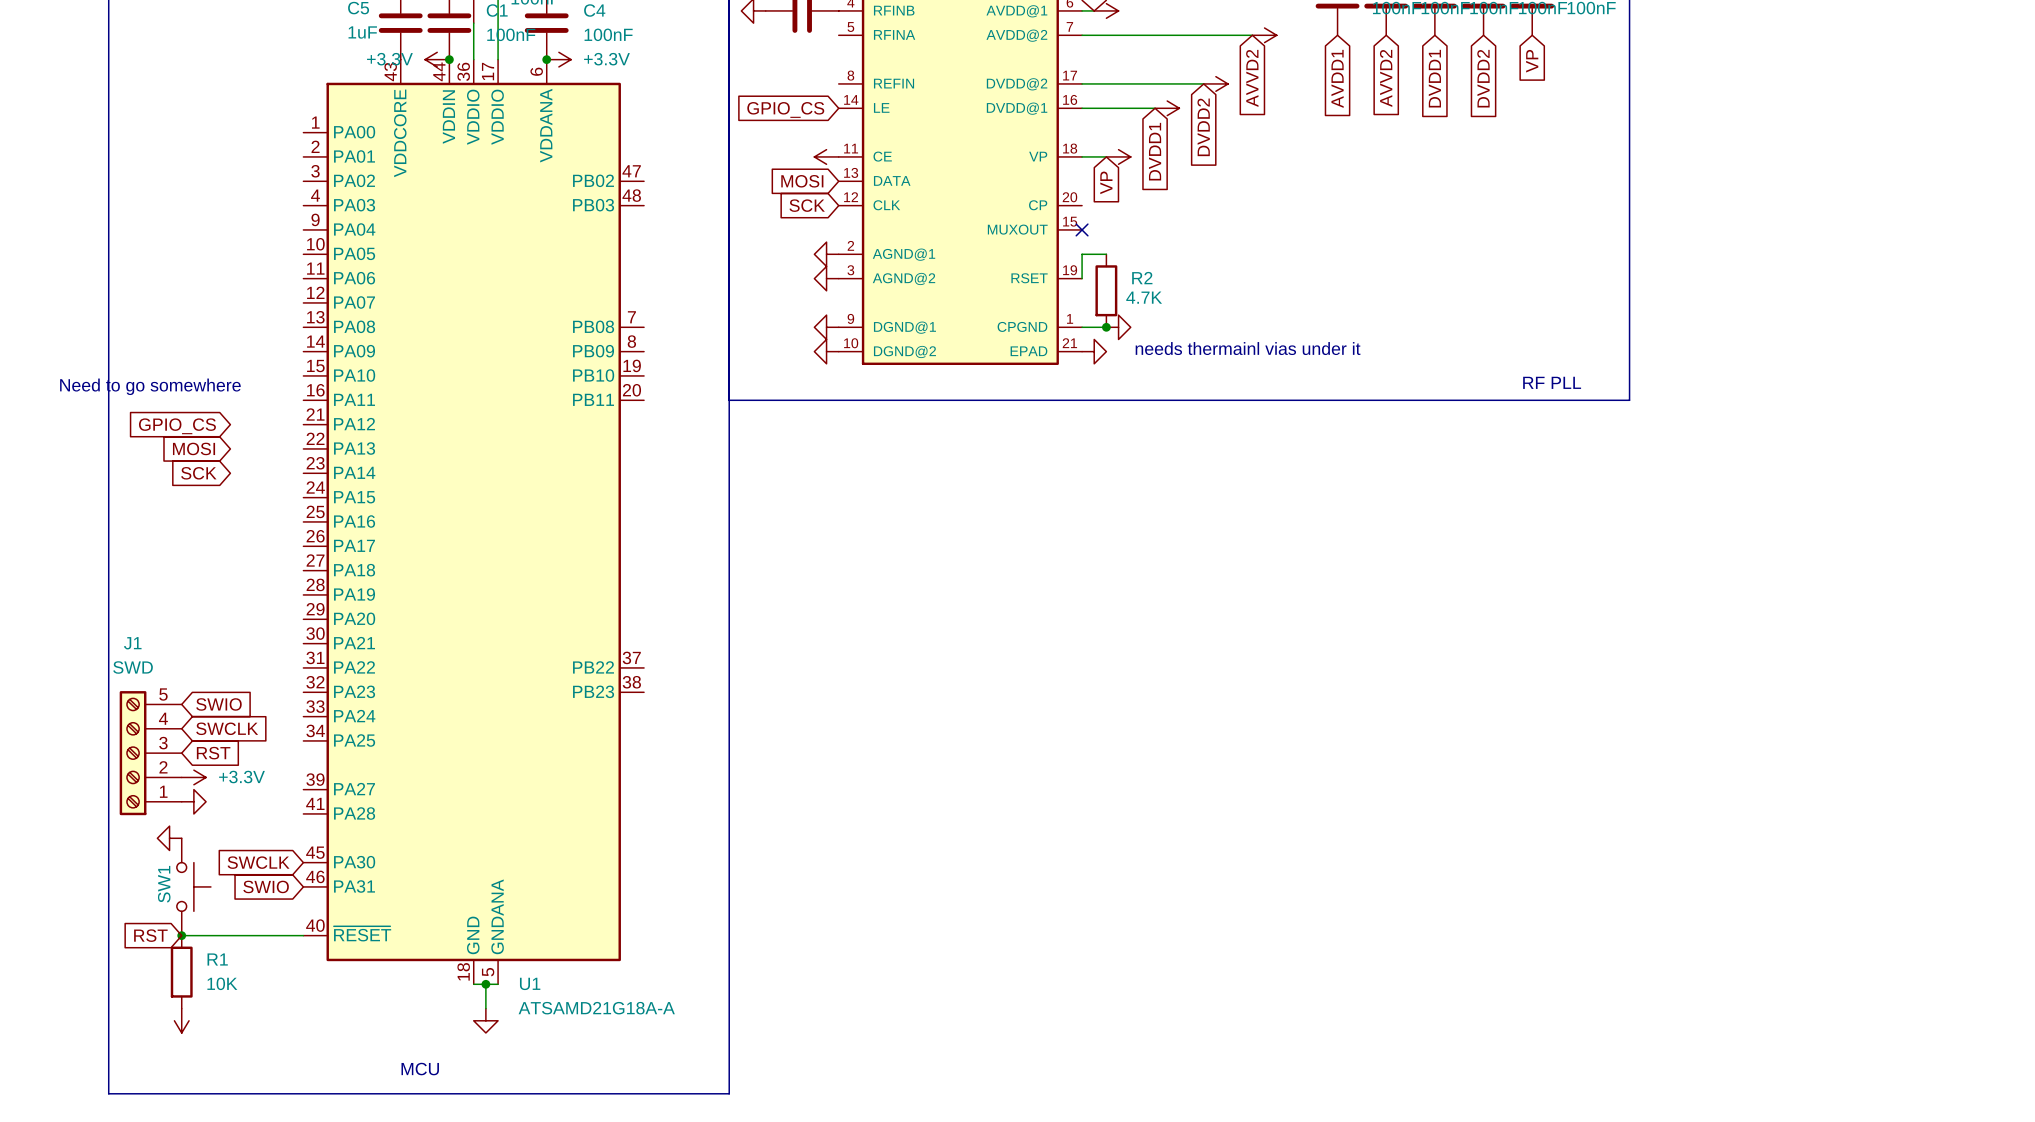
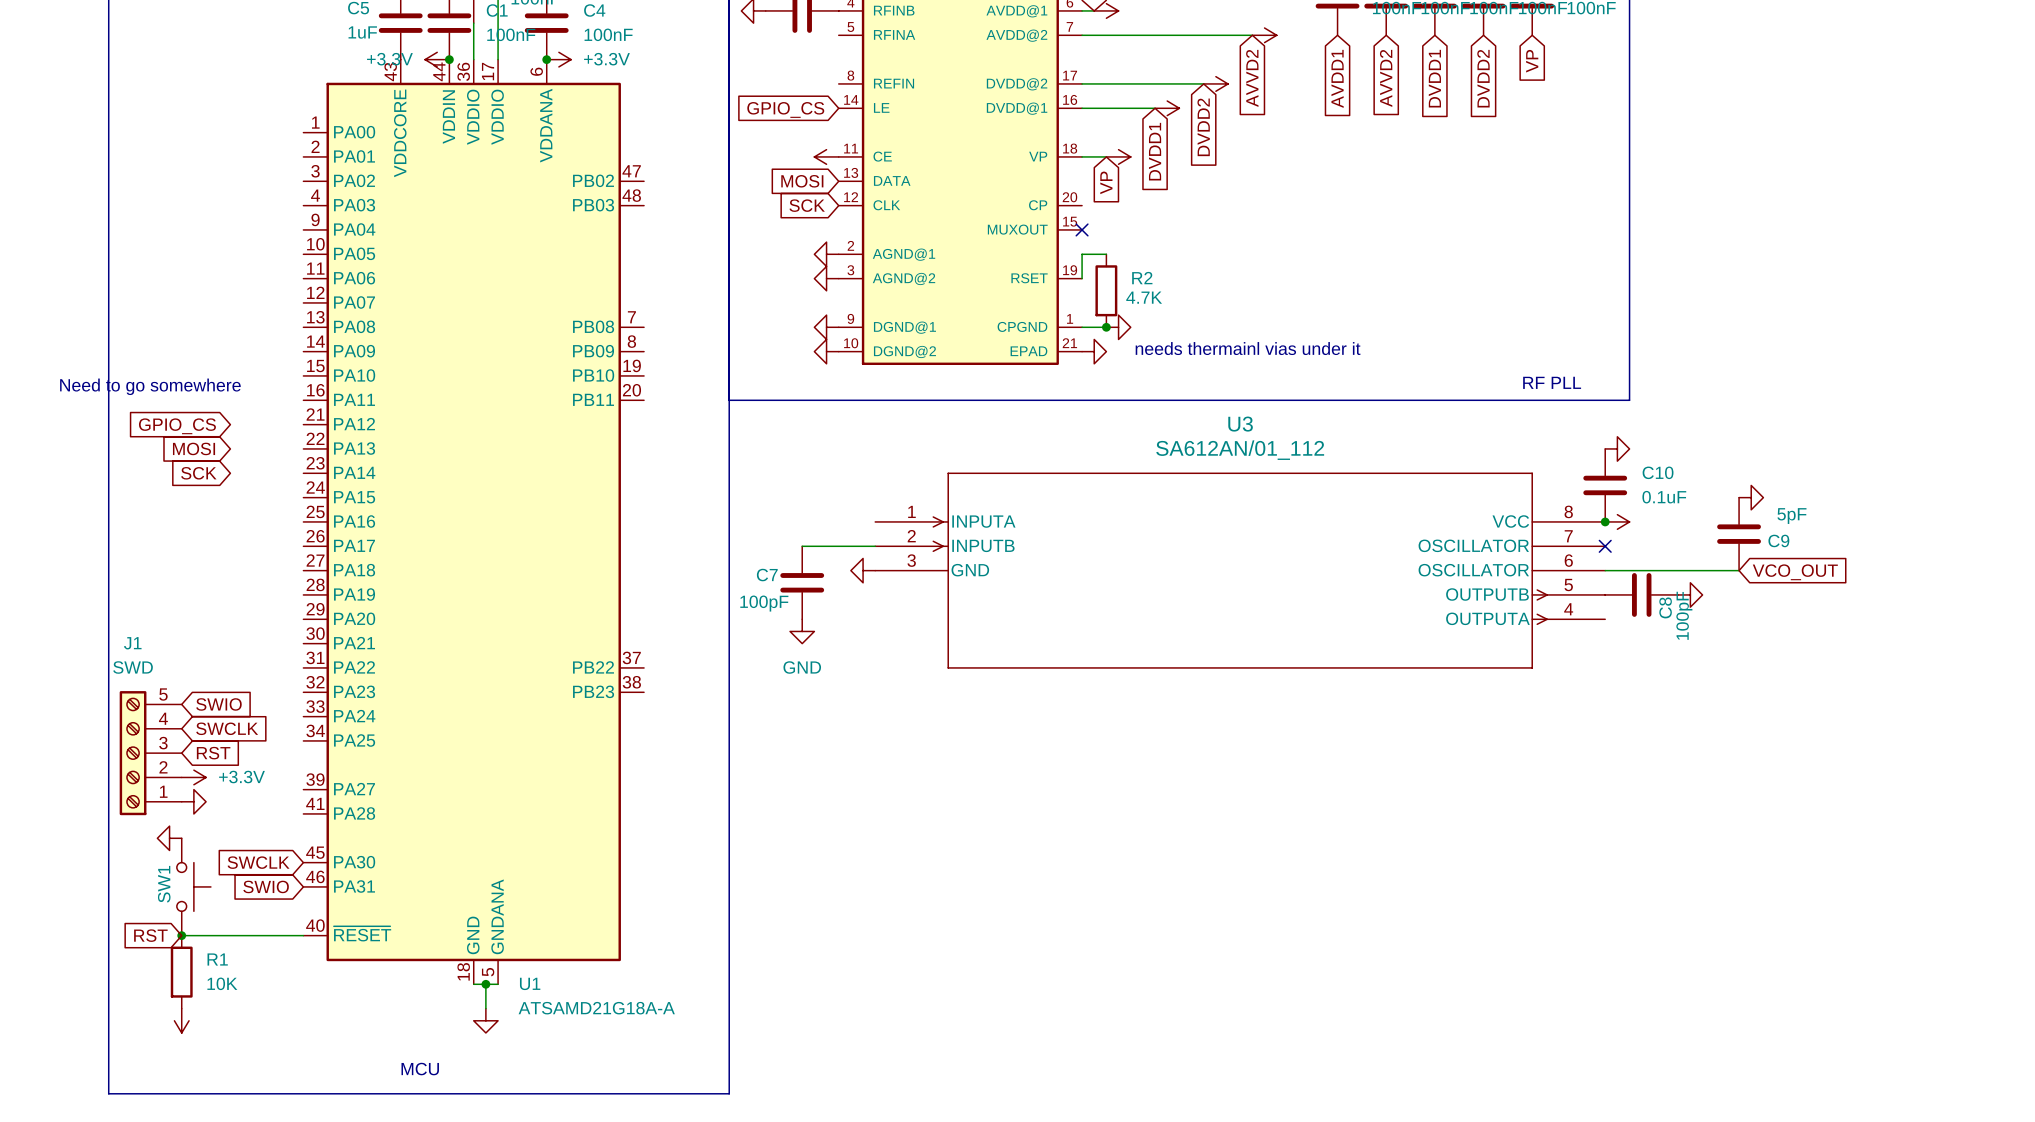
power symbol: none -> (1617, 448)
C10: none -> 0.1uF (1605, 485)
power symbol: none -> (1751, 497)
junction: none -> (1605, 521)
power symbol: none -> (1617, 521)
C9: none -> 5pF (1739, 534)
wire: none -> (802, 546) (875, 546)
no-connect mark: none -> (1605, 546)
power symbol: none -> (863, 570)
U3: none -> SA612AN/01_112 (1240, 570)
wire: none -> (1605, 570) (1739, 570)
global label: none -> VCO_OUT (1795, 572)
C7: none -> 100pF (802, 582)
C8: none -> 100pF (1641, 594)
power symbol: none -> (1690, 594)
power symbol: none -> GND (802, 631)

